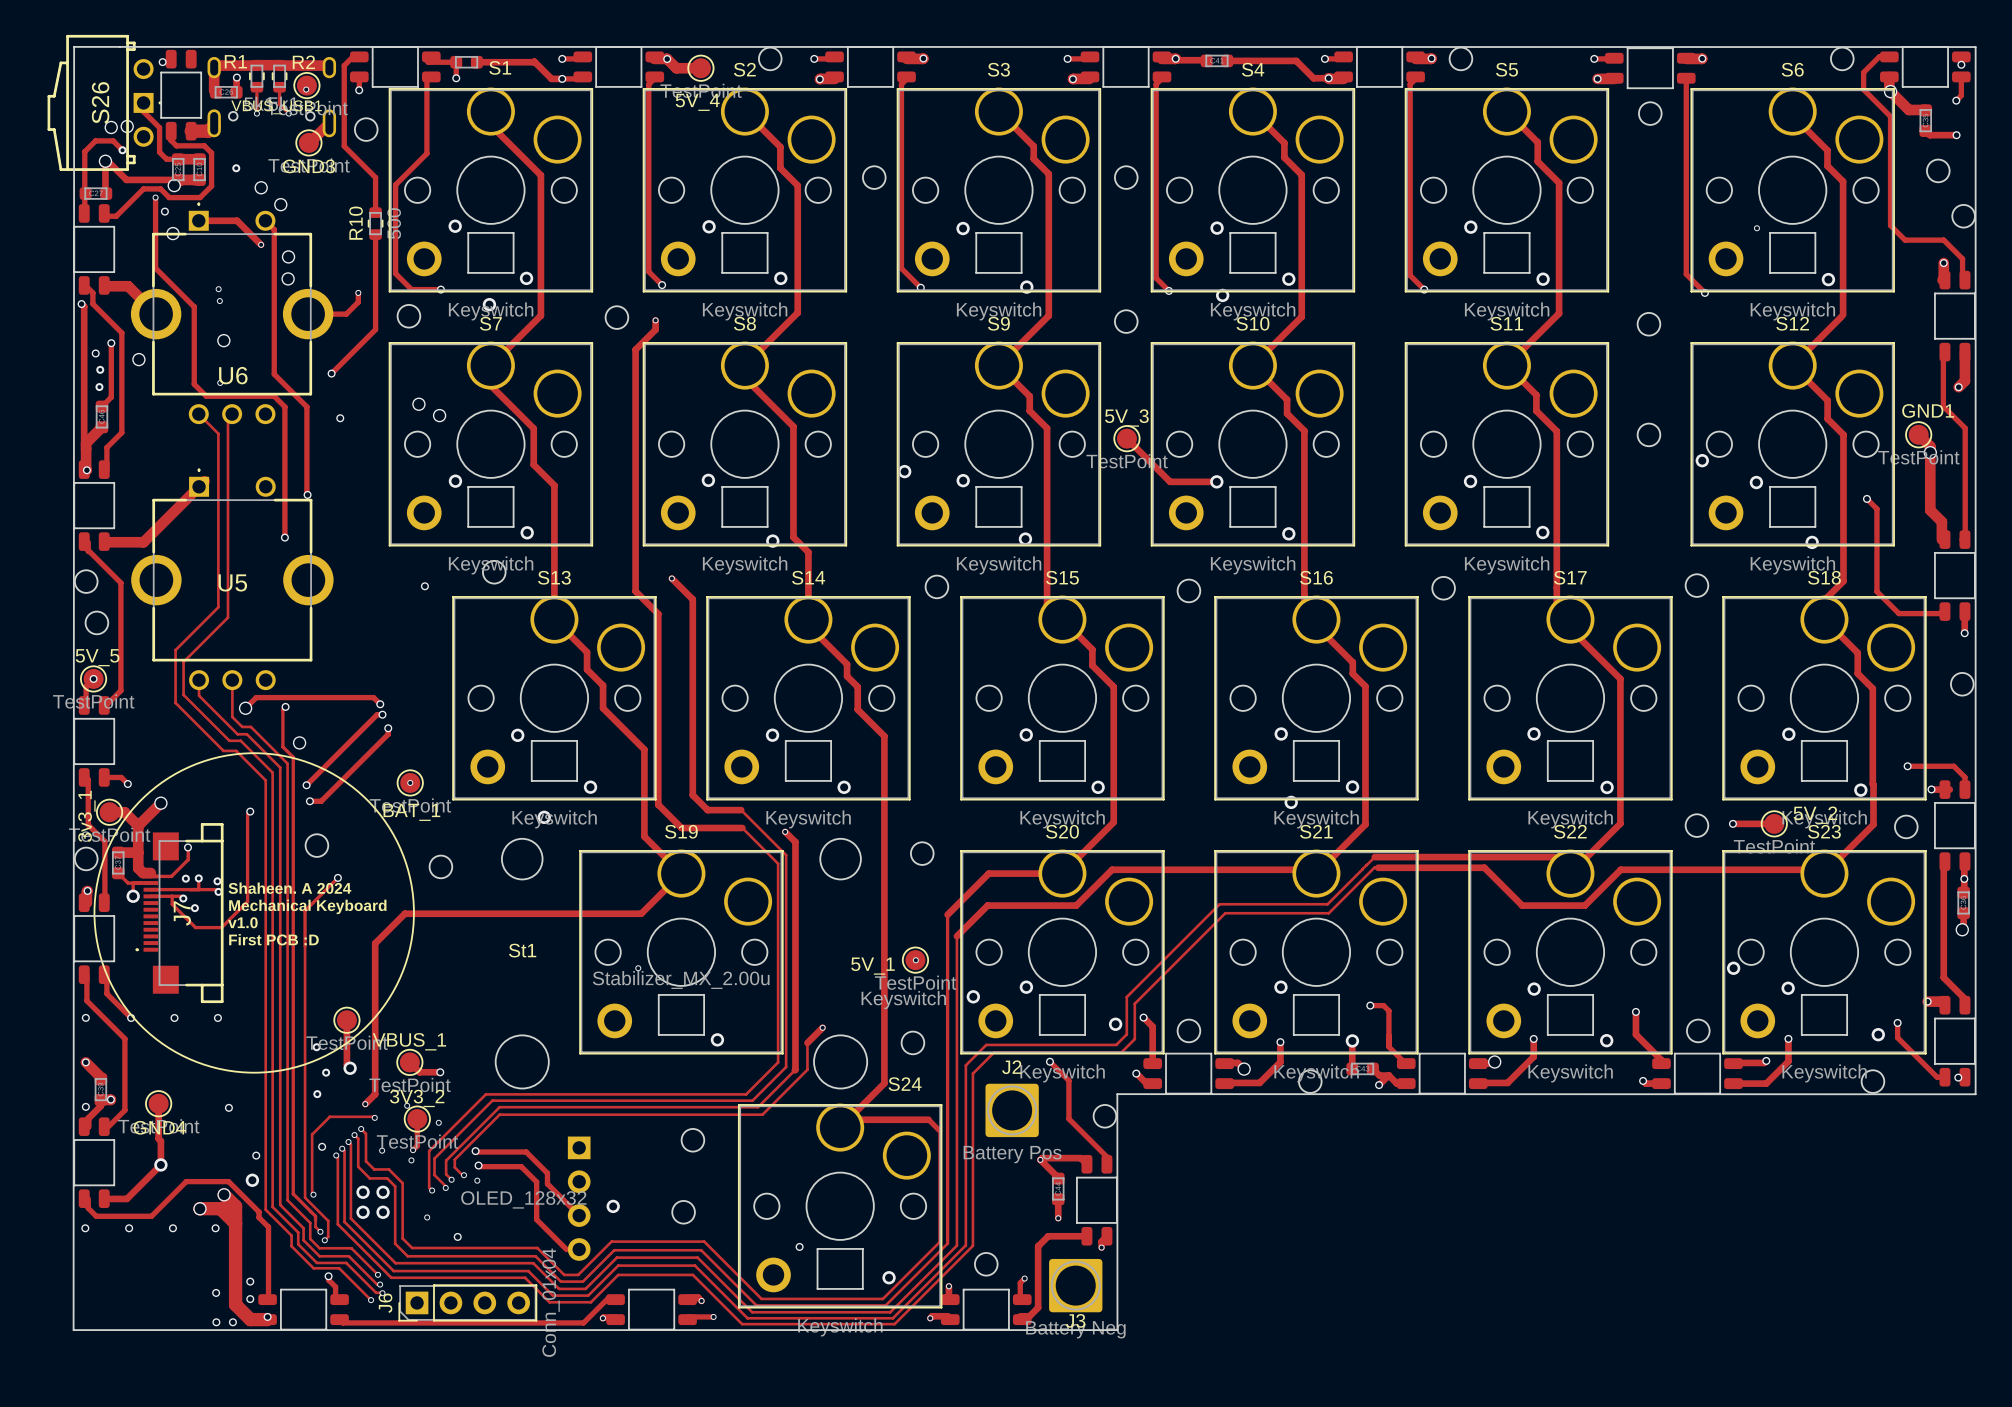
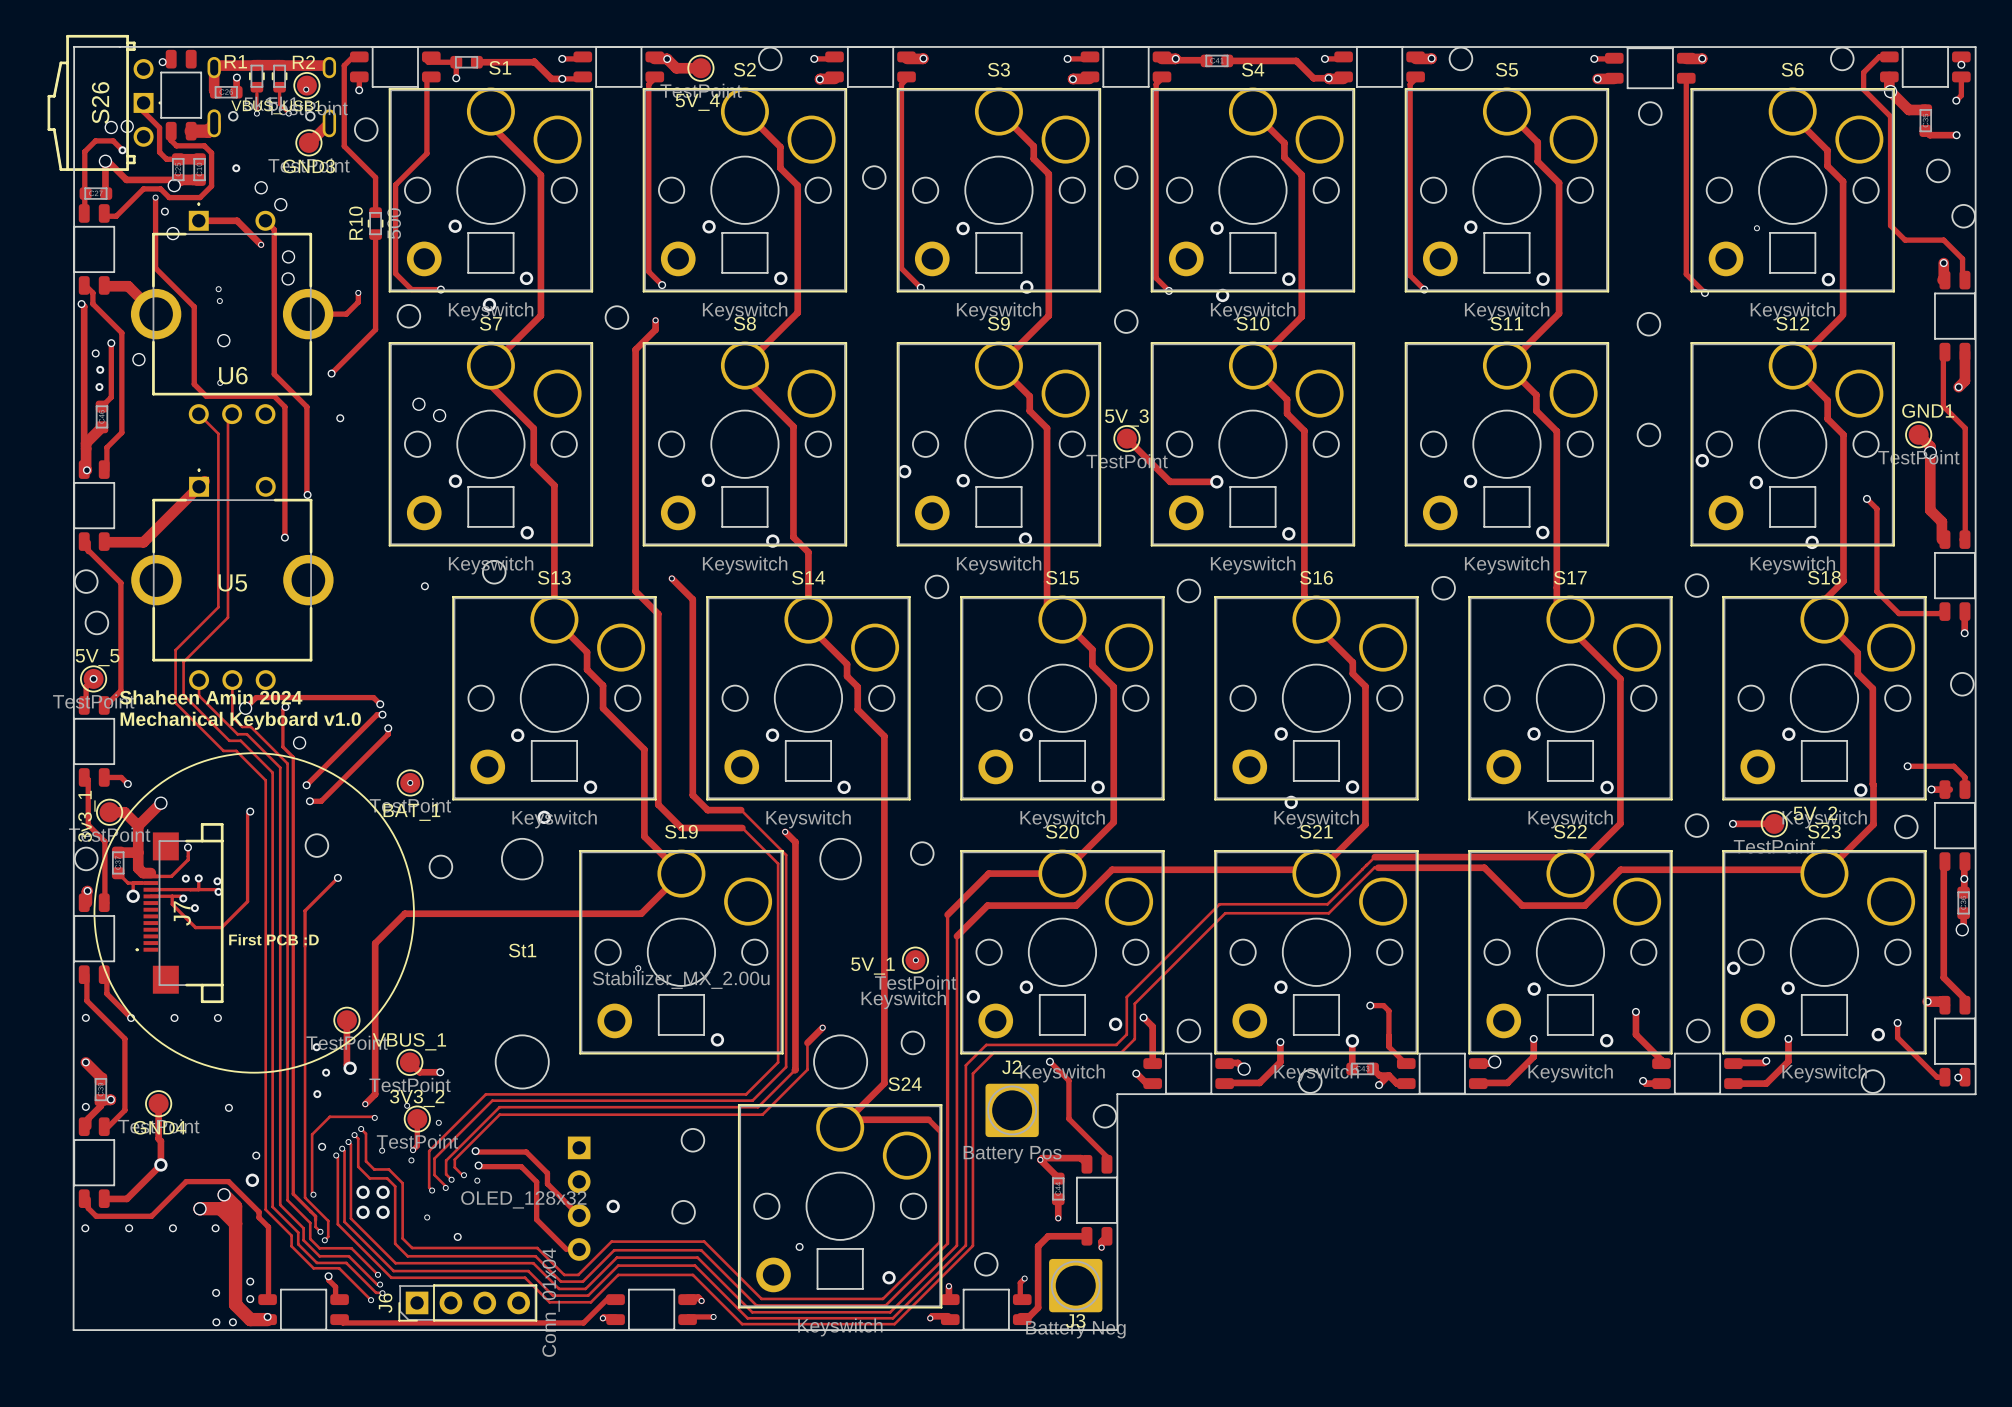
text: none -> Shaheen Amin 2024 (211, 697)
text: none -> Mechanical Keyboard v1.0 (240, 720)
text: Shaheen. A 2024 (289, 888) -> none
text: Mechanical Keyboard (307, 906) -> none
text: v1.0 (242, 922) -> none

